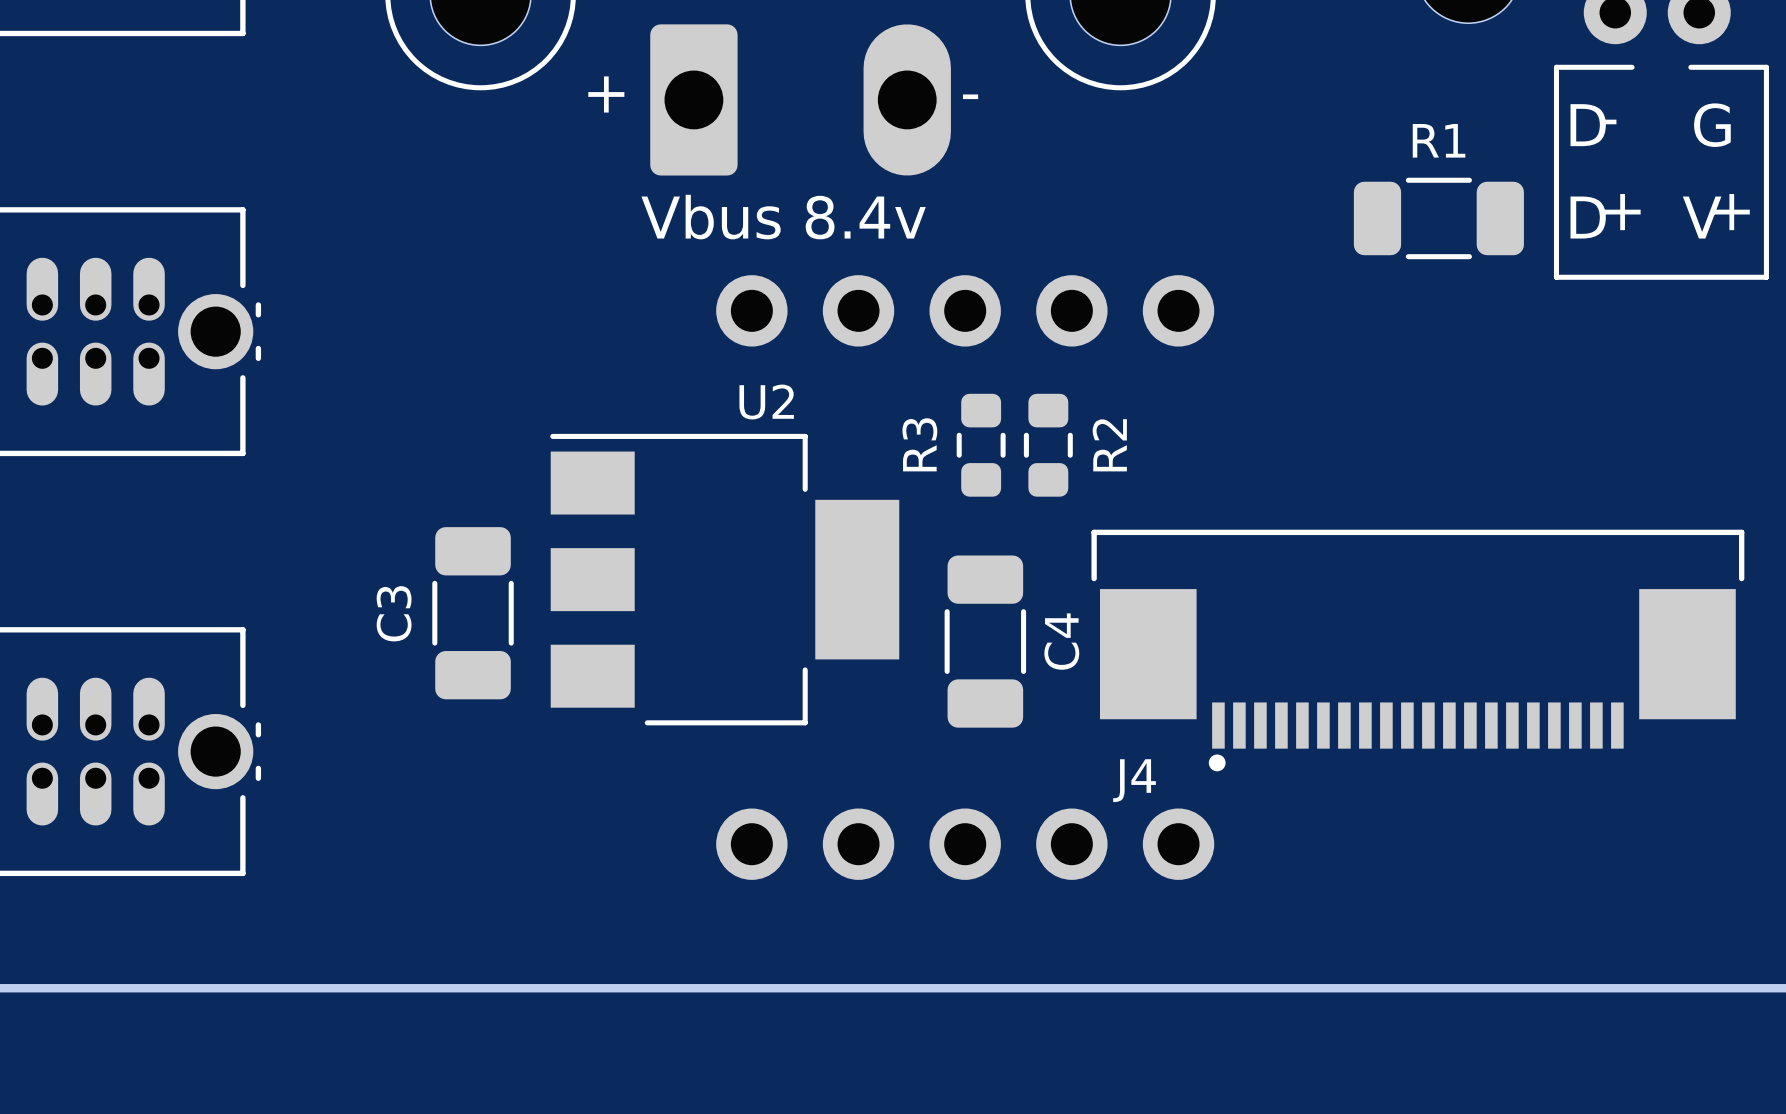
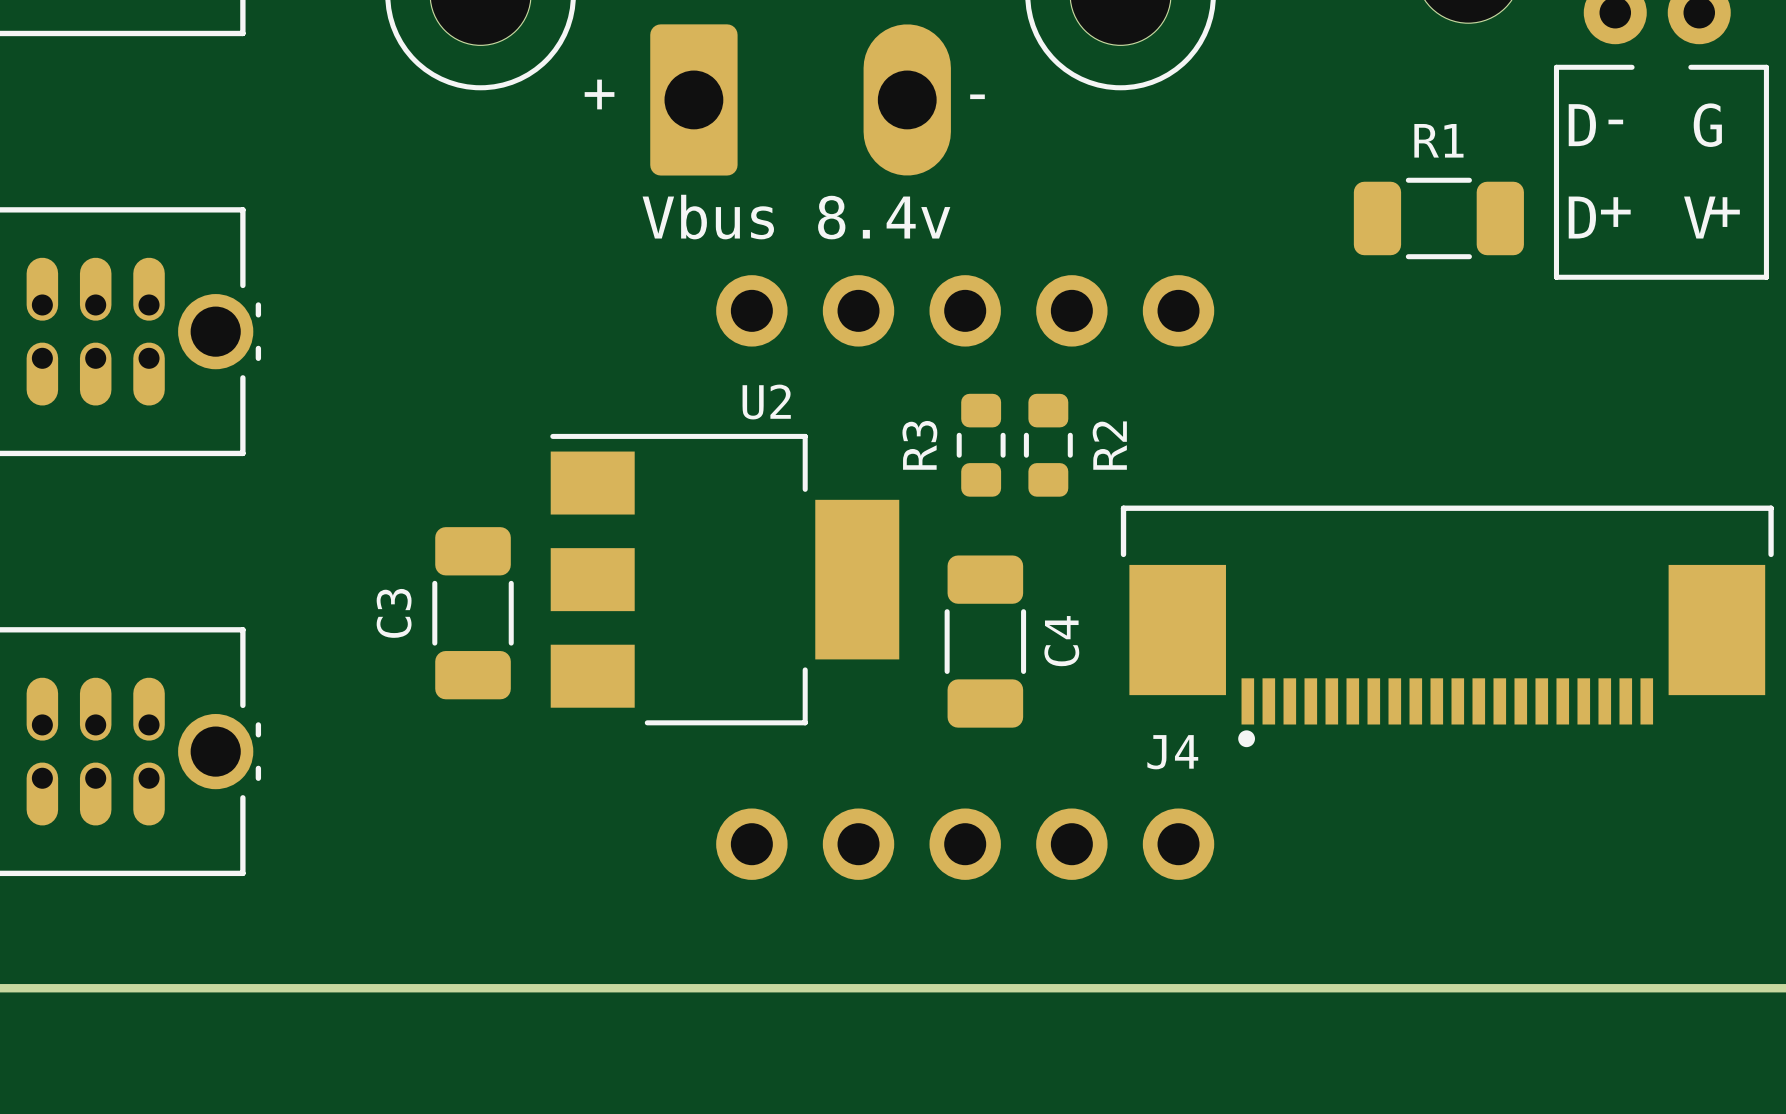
J4 position: (1417, 650) -> (1447, 626)

